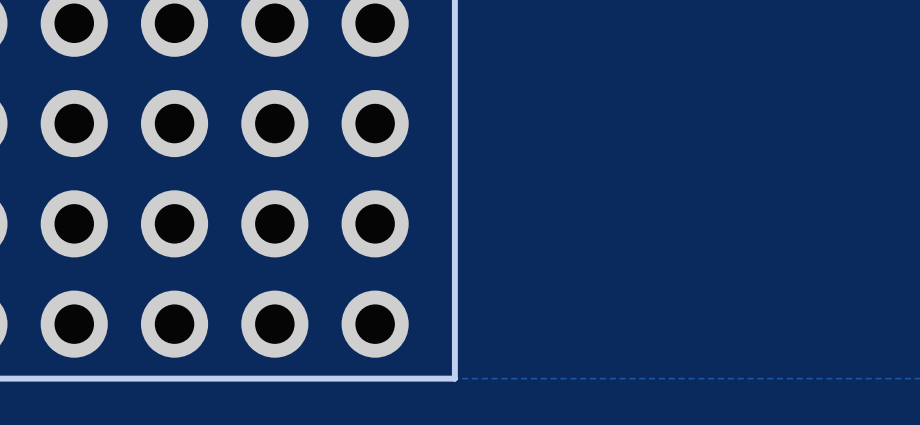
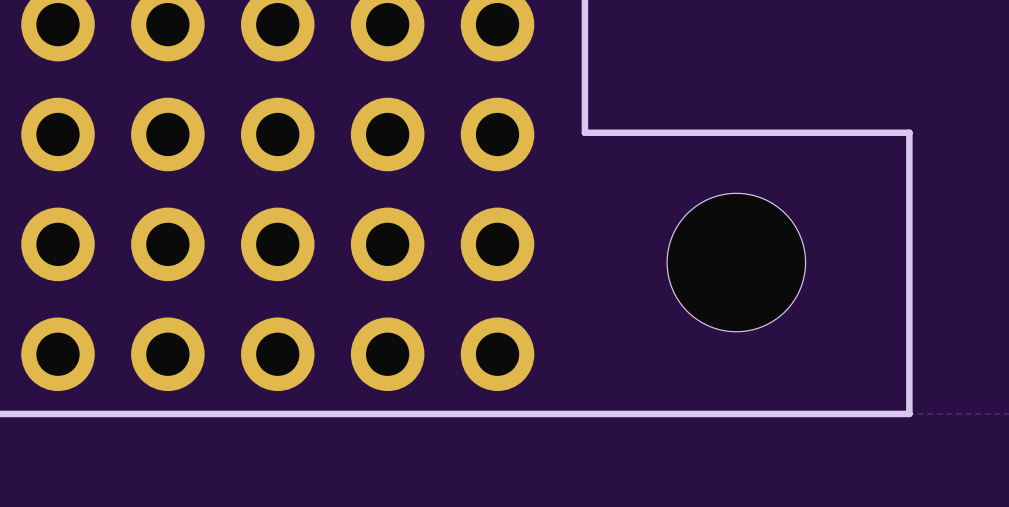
board edge: (454, 121) (454, 378) -> (584, 132) (909, 132) (909, 413) (584, 413)
part: none -> (736, 262)

